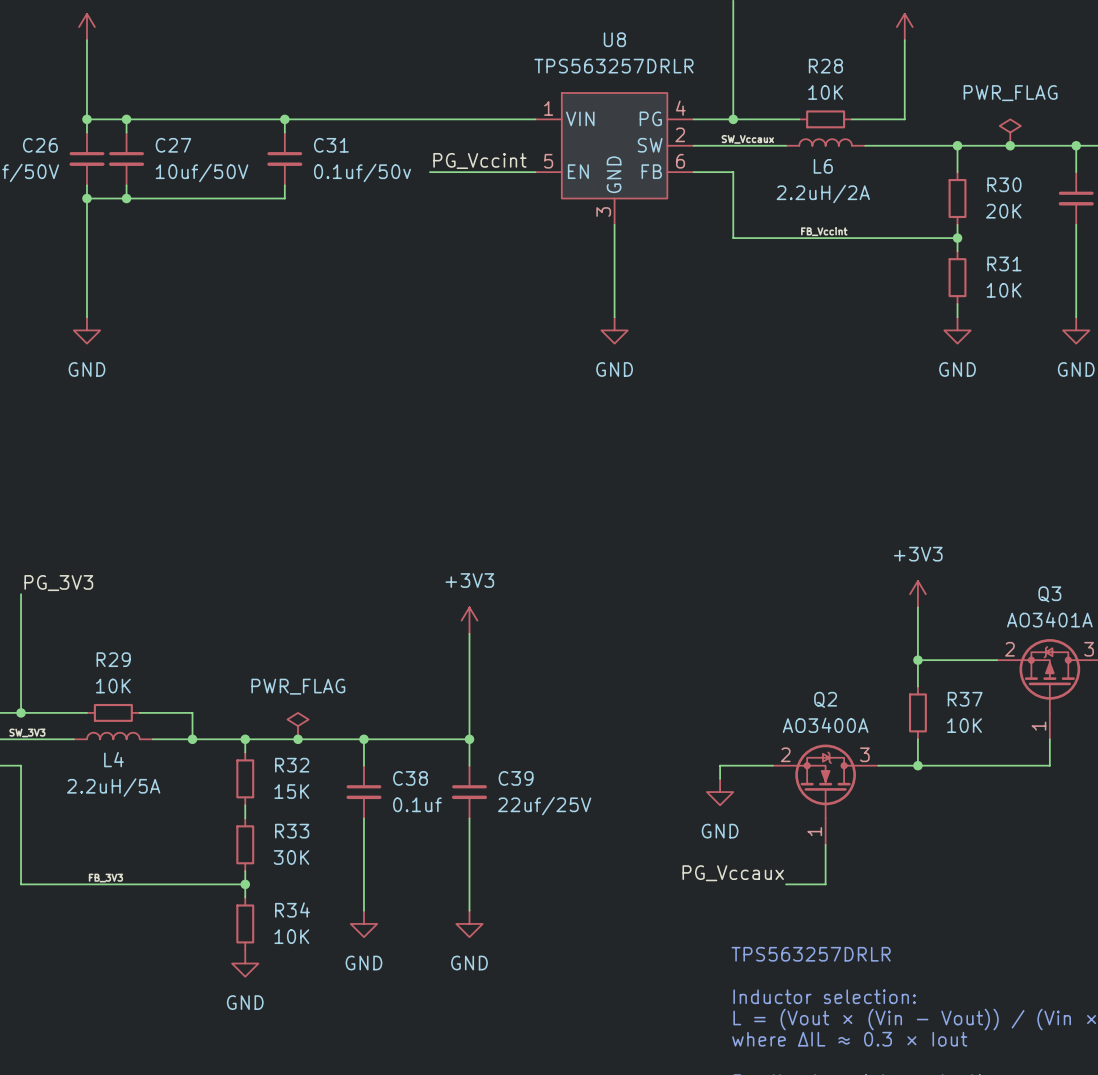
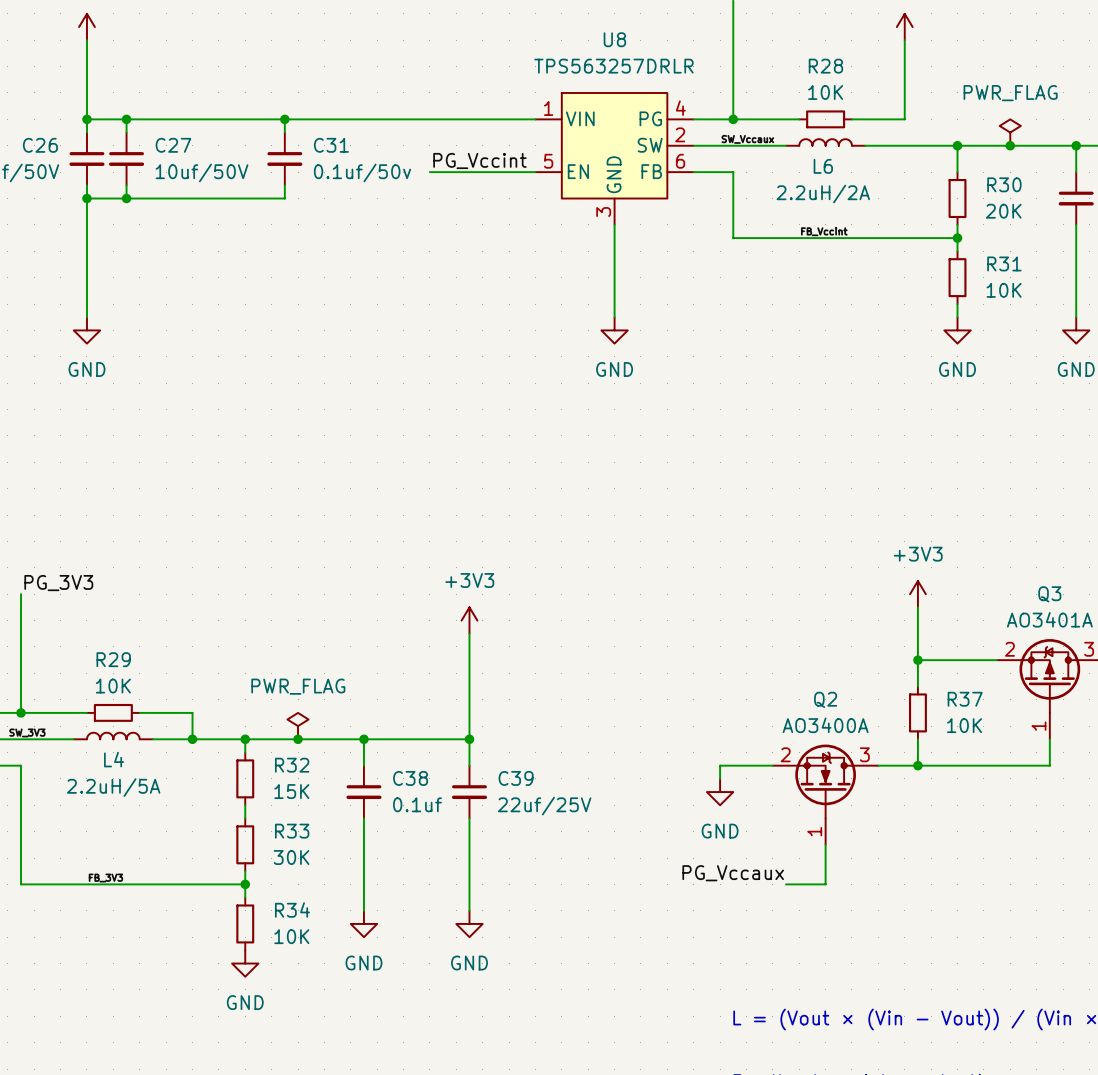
text: TPS563257DRLR (811, 954) -> none
text: Inductor selection: (824, 996) -> none
text: where ΔIL ≈ 0.3 × Iout (849, 1039) -> none

